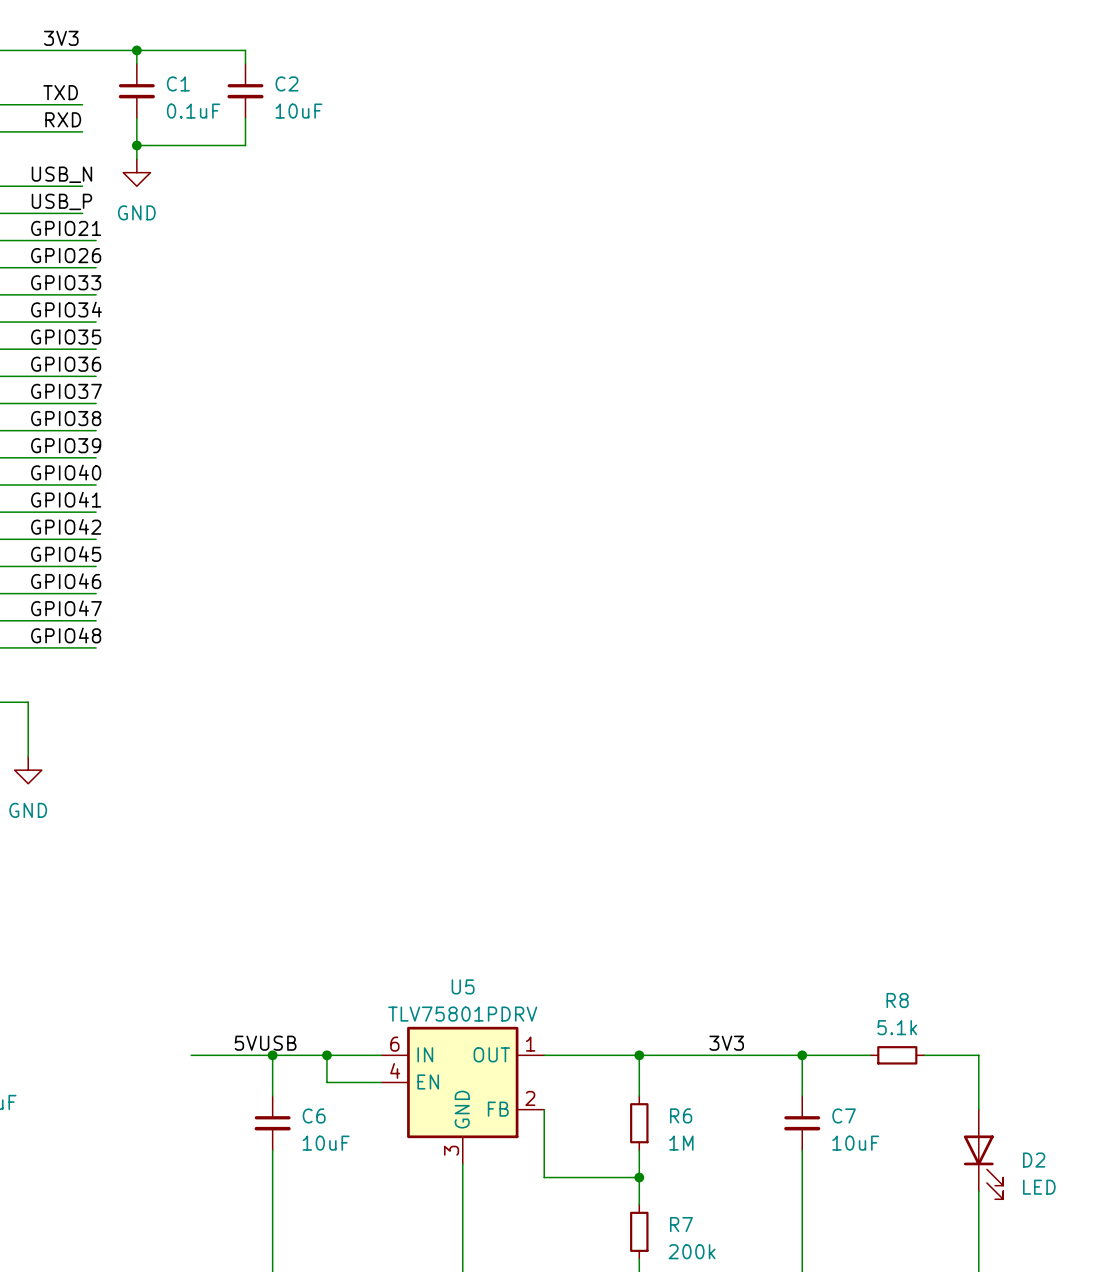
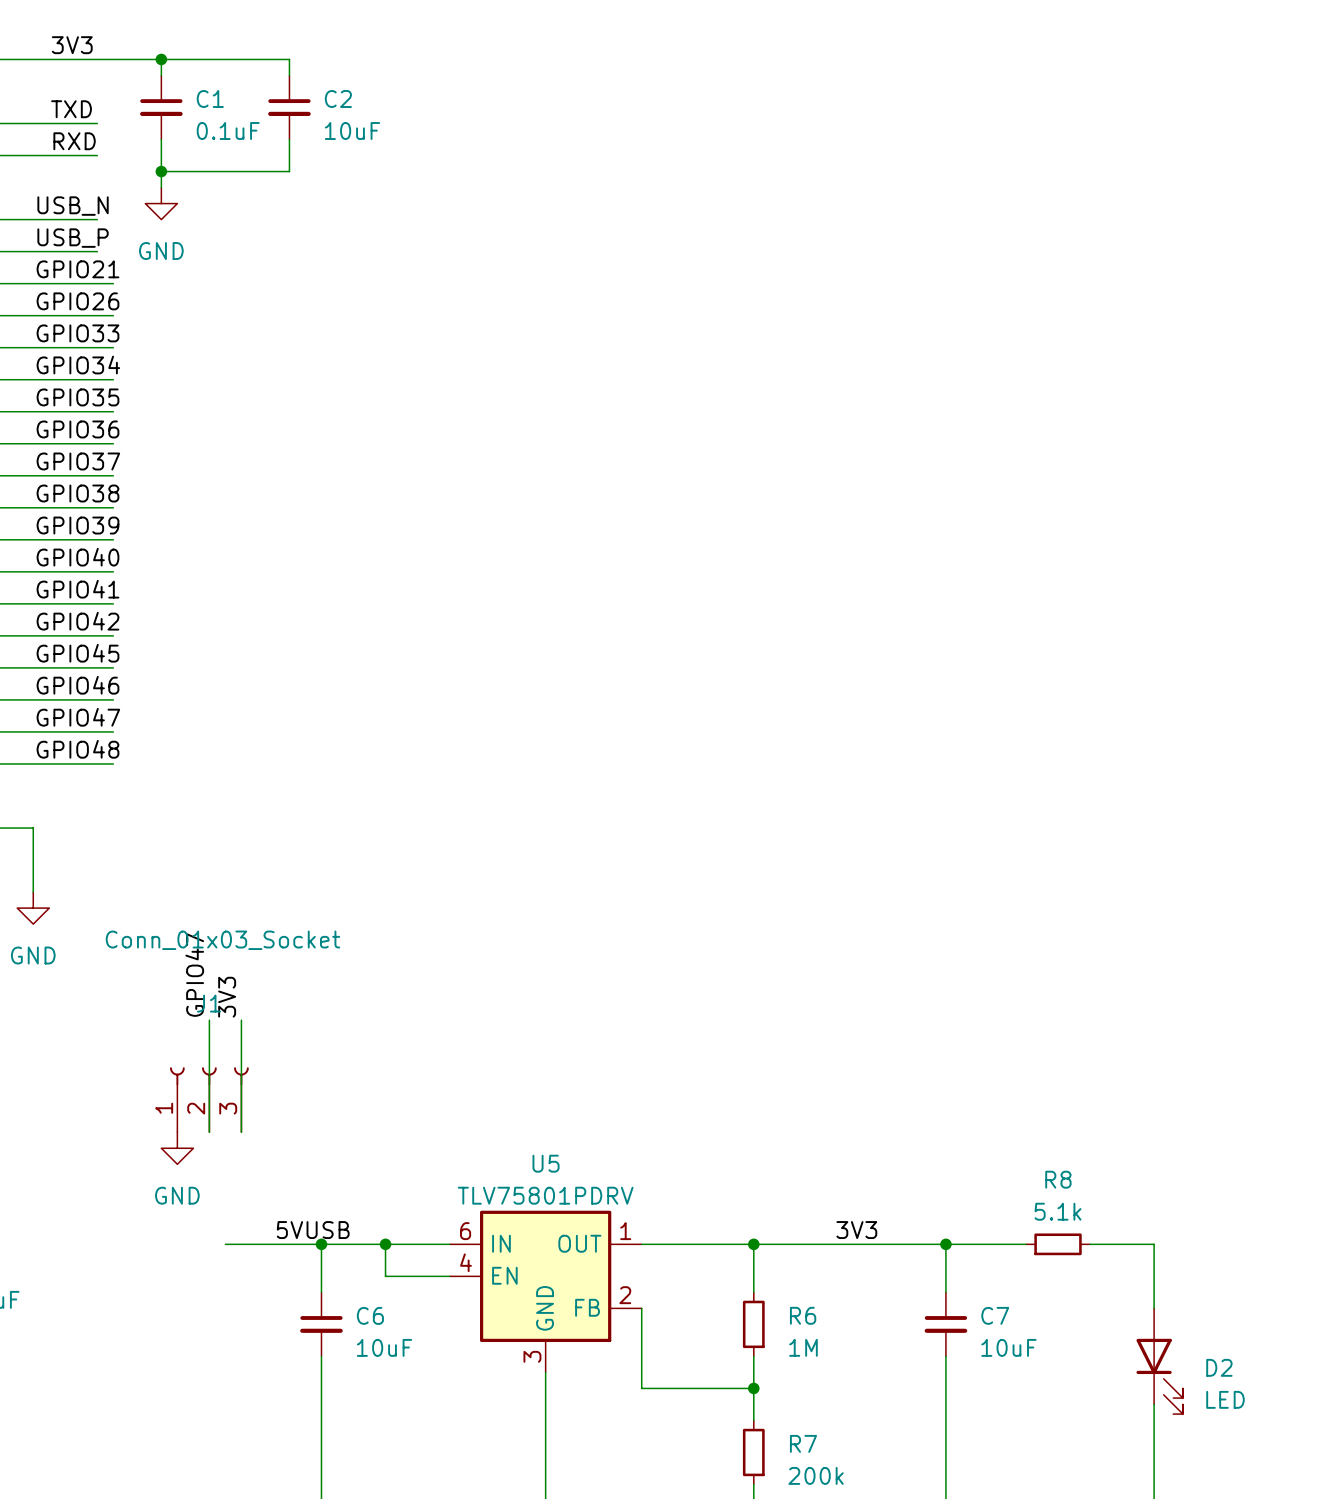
label: none -> GPIO47 (194, 975)
label: none -> 3V3 (227, 997)
wire: none -> (209, 1020) (209, 1132)
wire: none -> (241, 1020) (241, 1132)
J1: none -> Conn_01x03_Socket (209, 1099)
power symbol: none -> GND (177, 1148)

